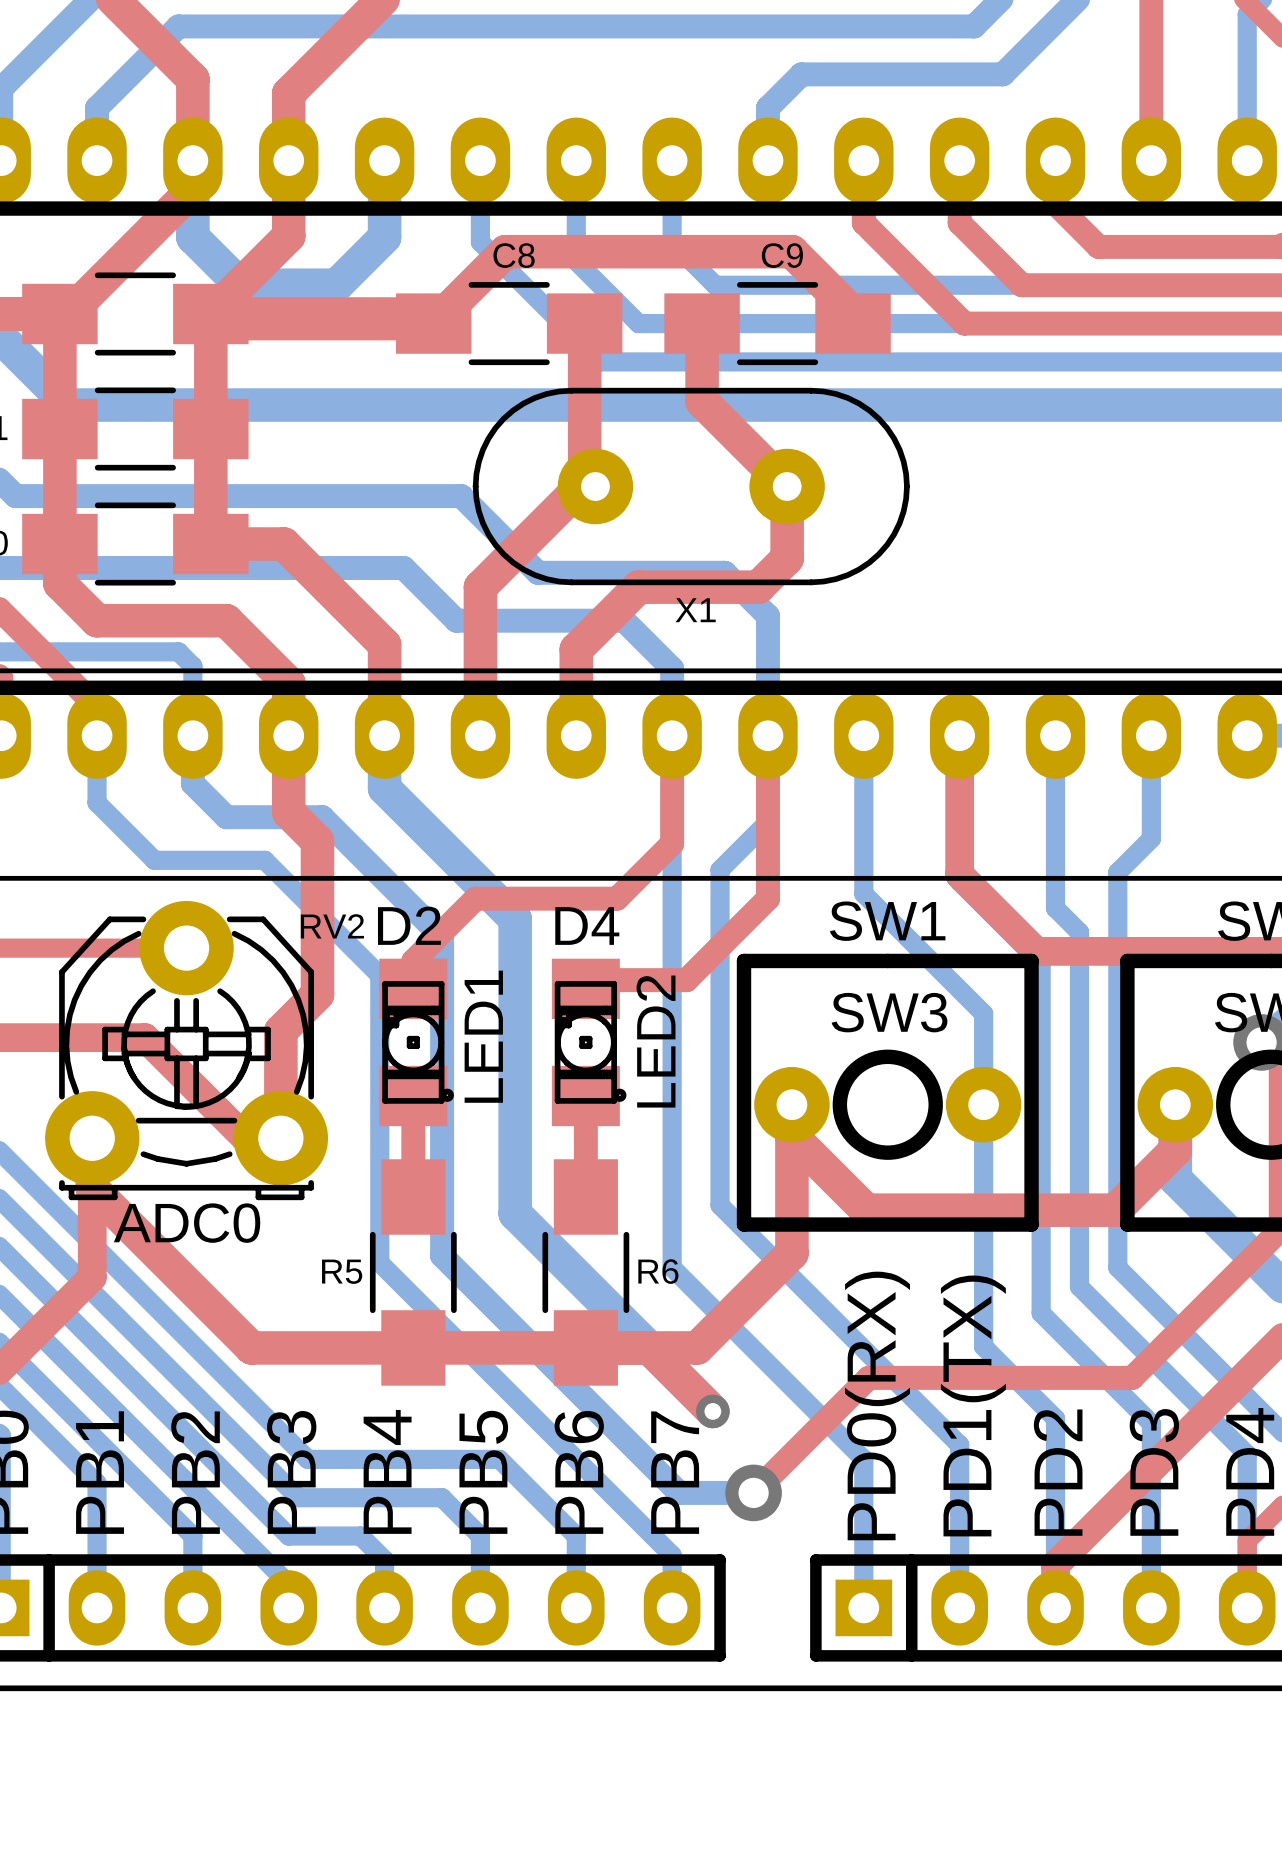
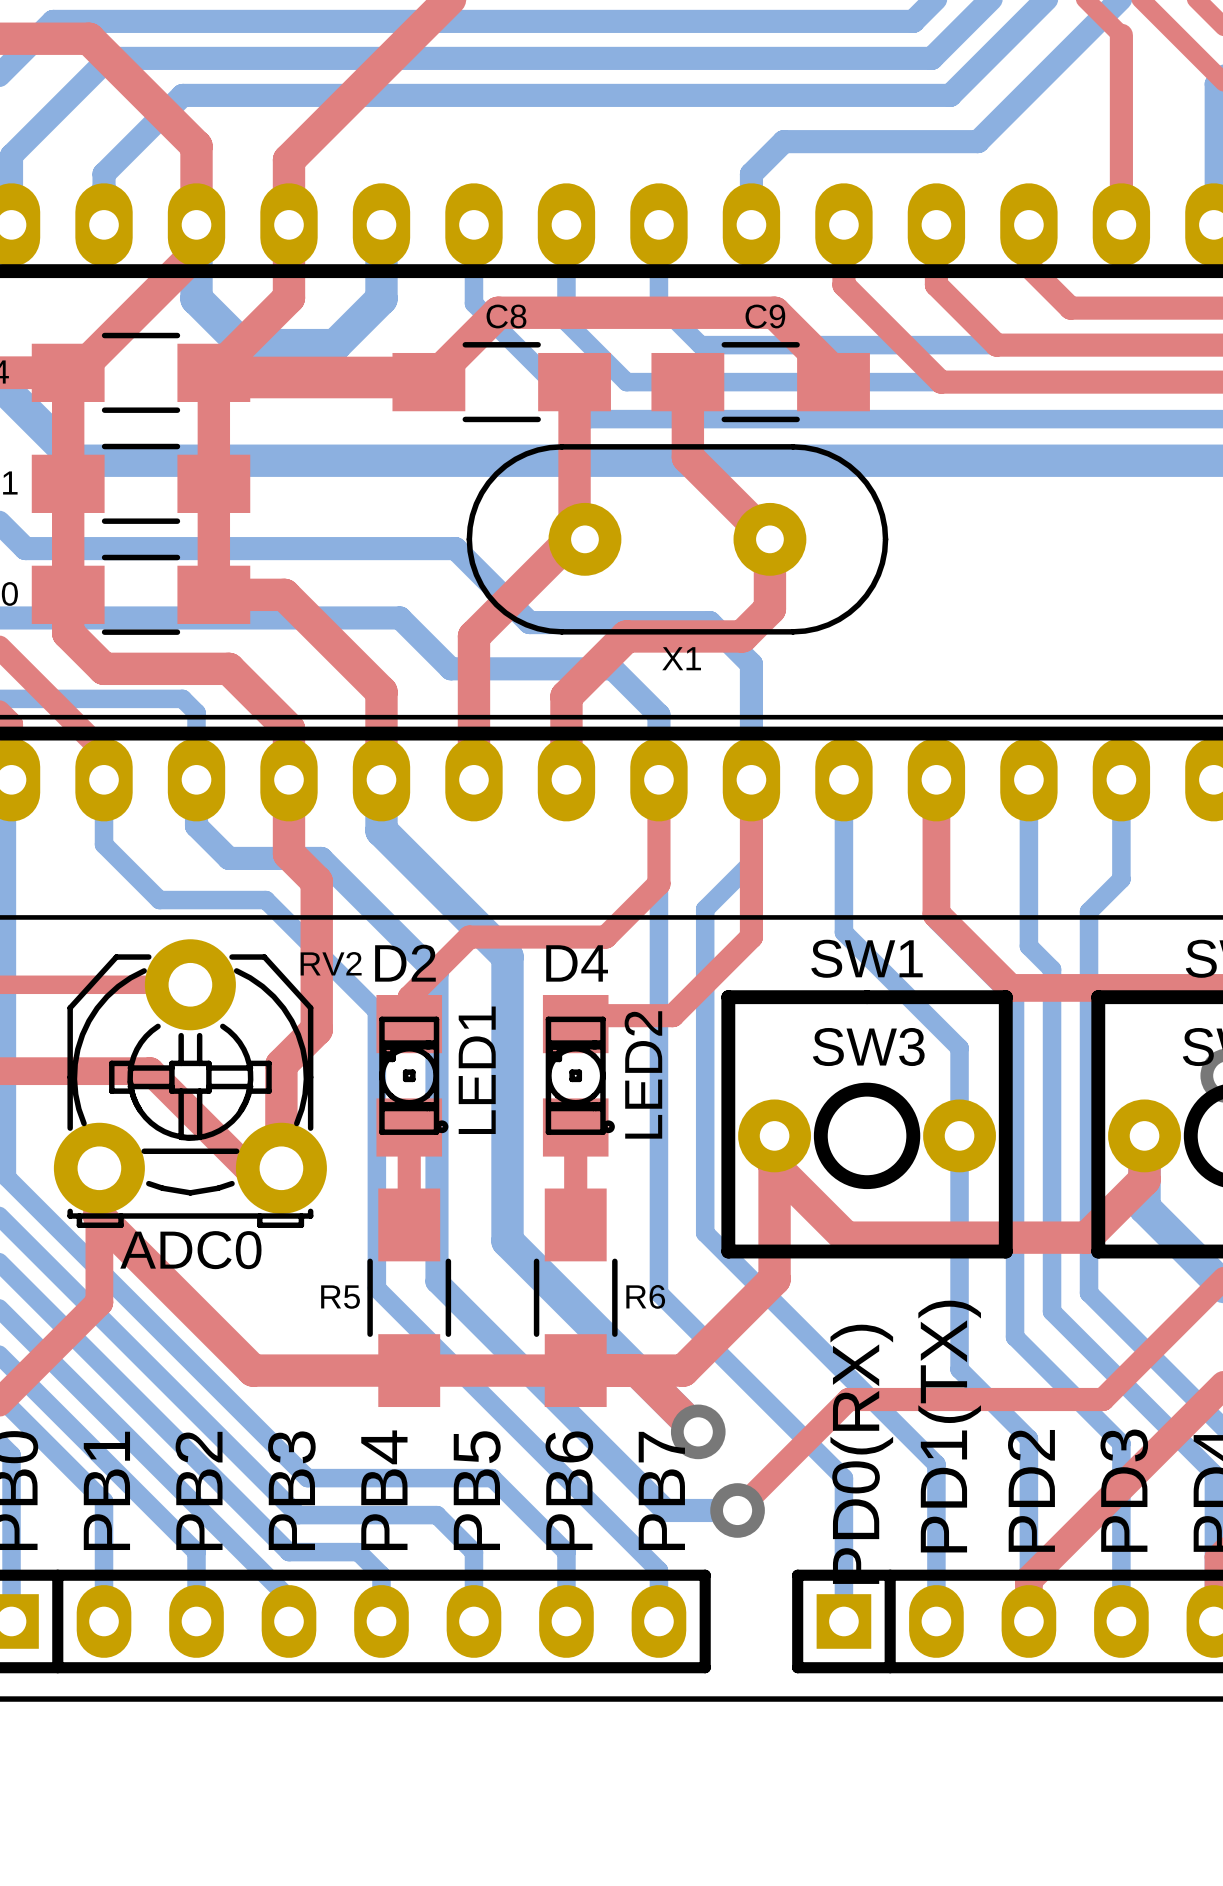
via size: [696, 1394, 730, 1429] -> [670, 1404, 726, 1460]
text position: PD0(RX) (877, 1405) -> PD0(RX) (861, 1454)

